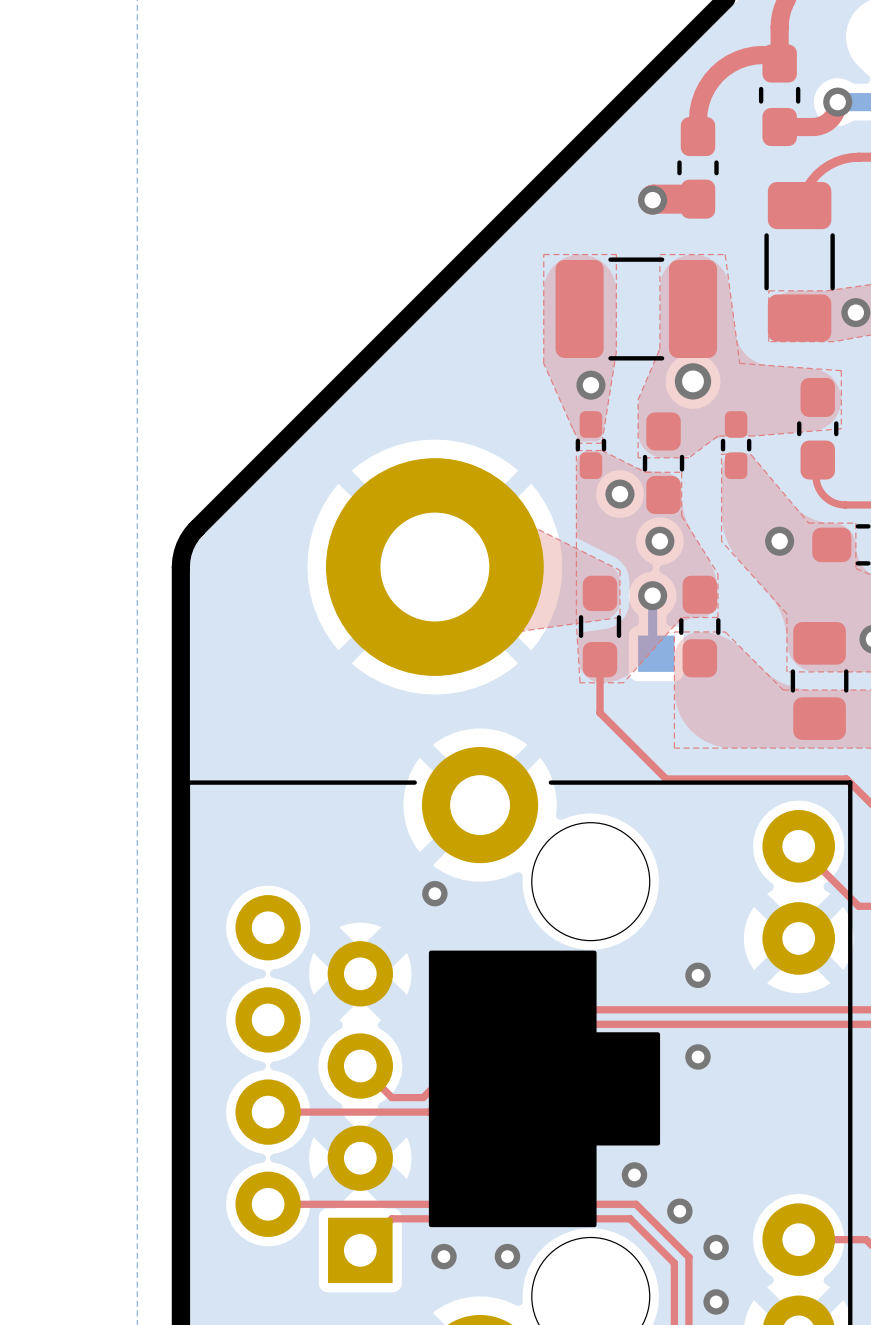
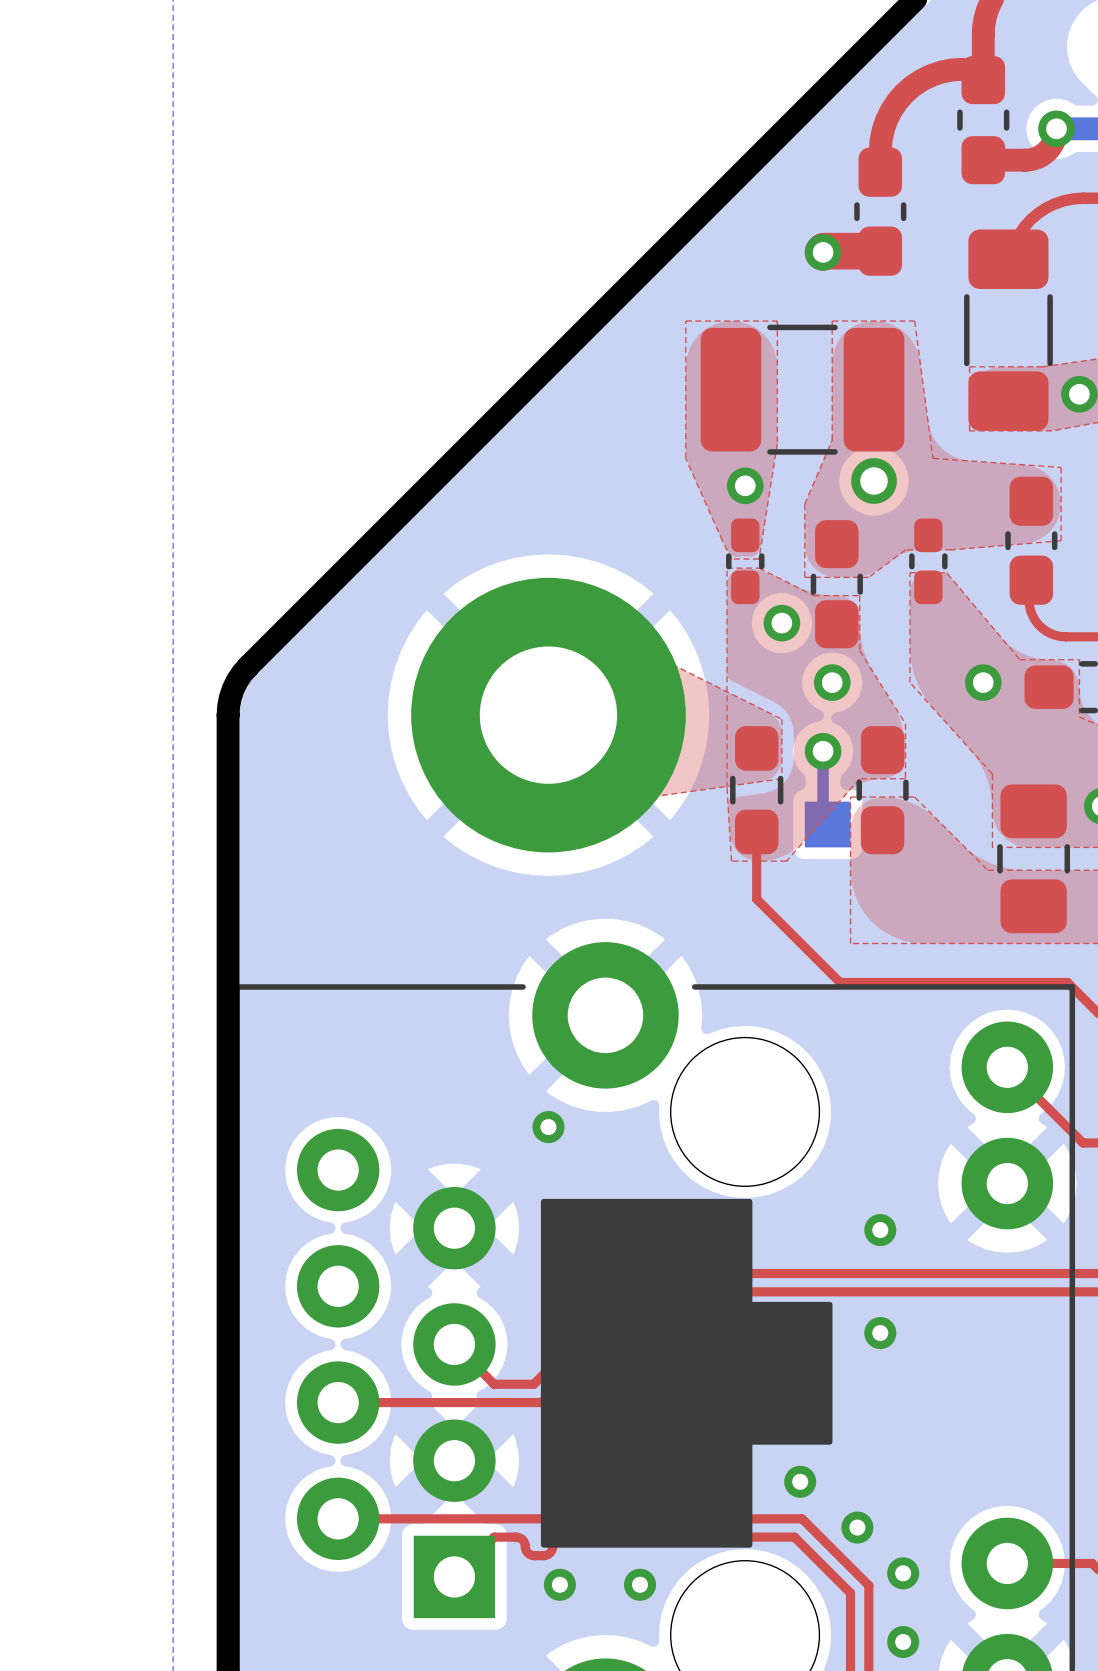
top track: (409, 1218) (445, 1218) -> (515, 1537) (522, 1539) (527, 1552) (534, 1555) (548, 1554) (554, 1540) (562, 1537)

